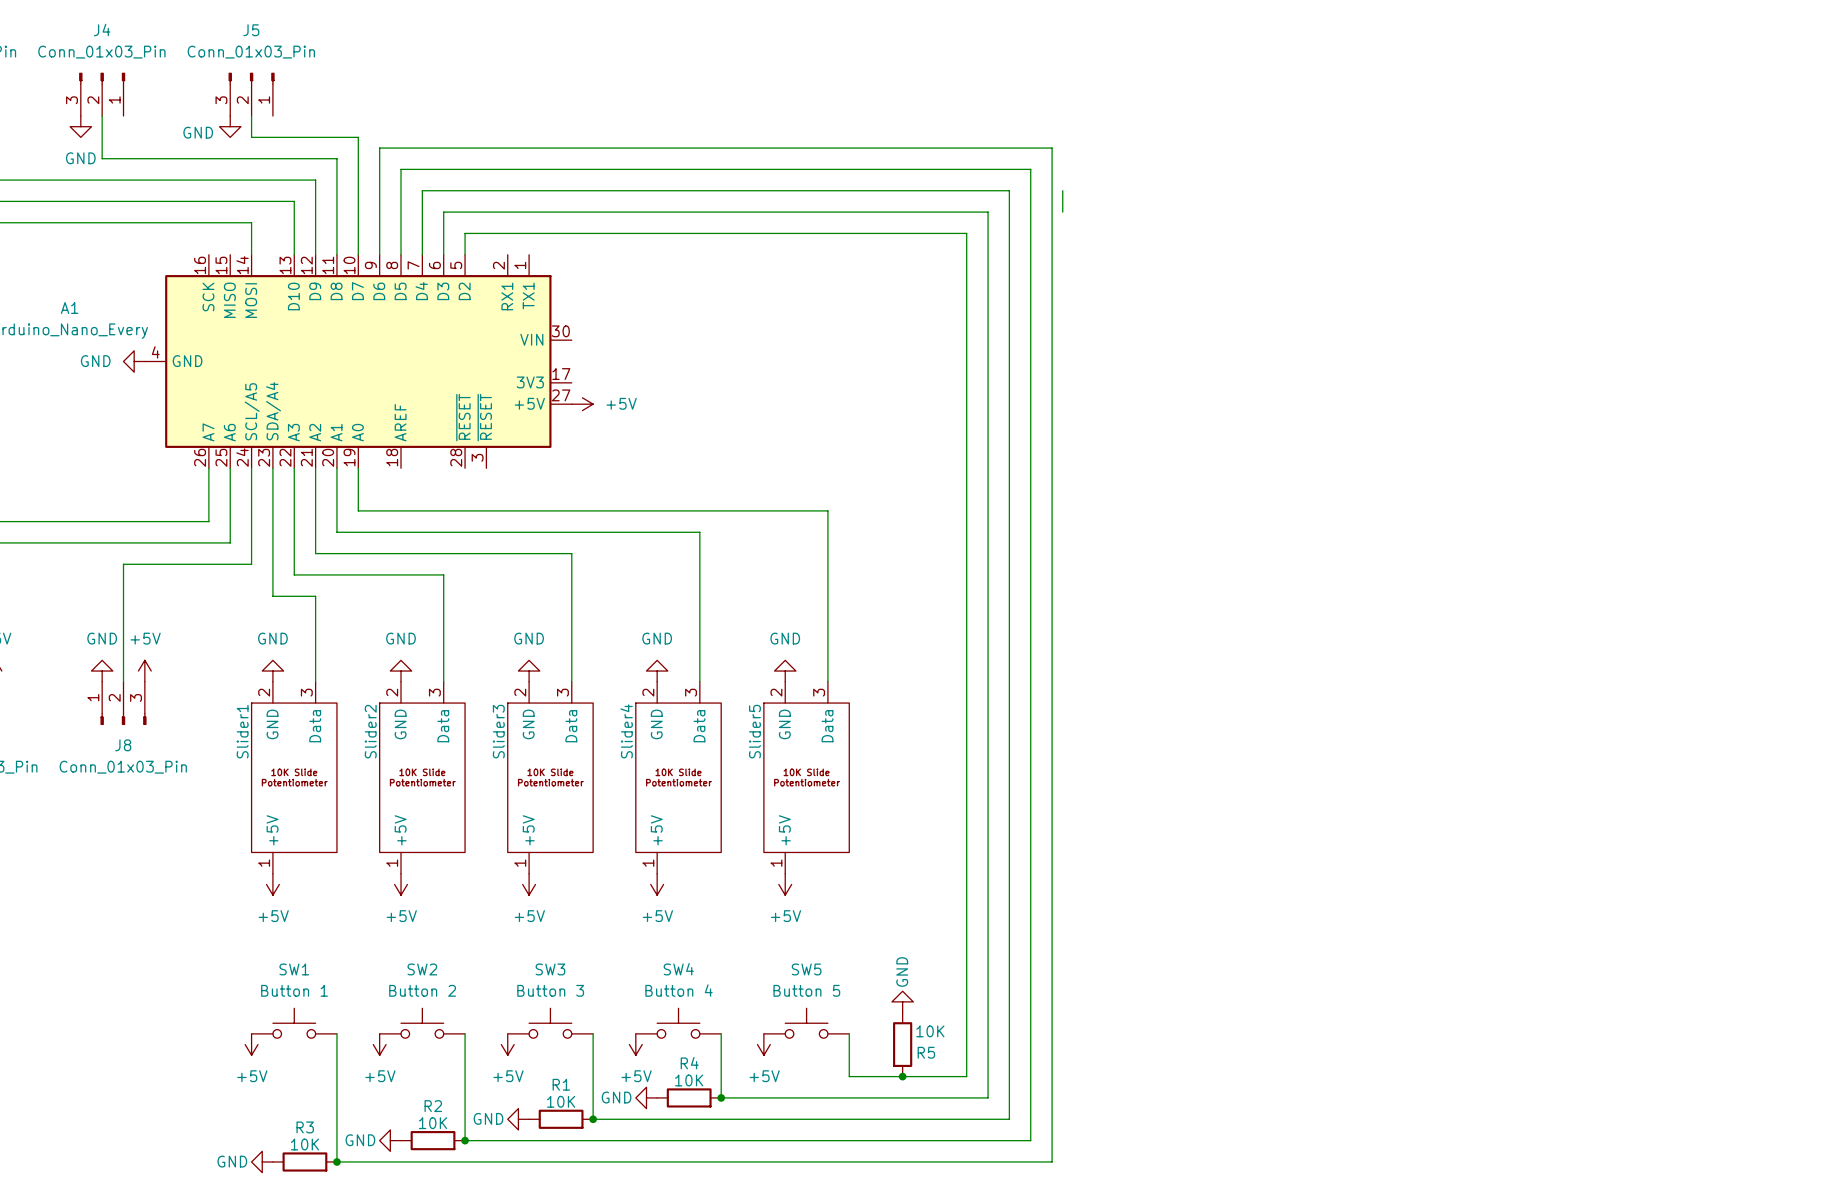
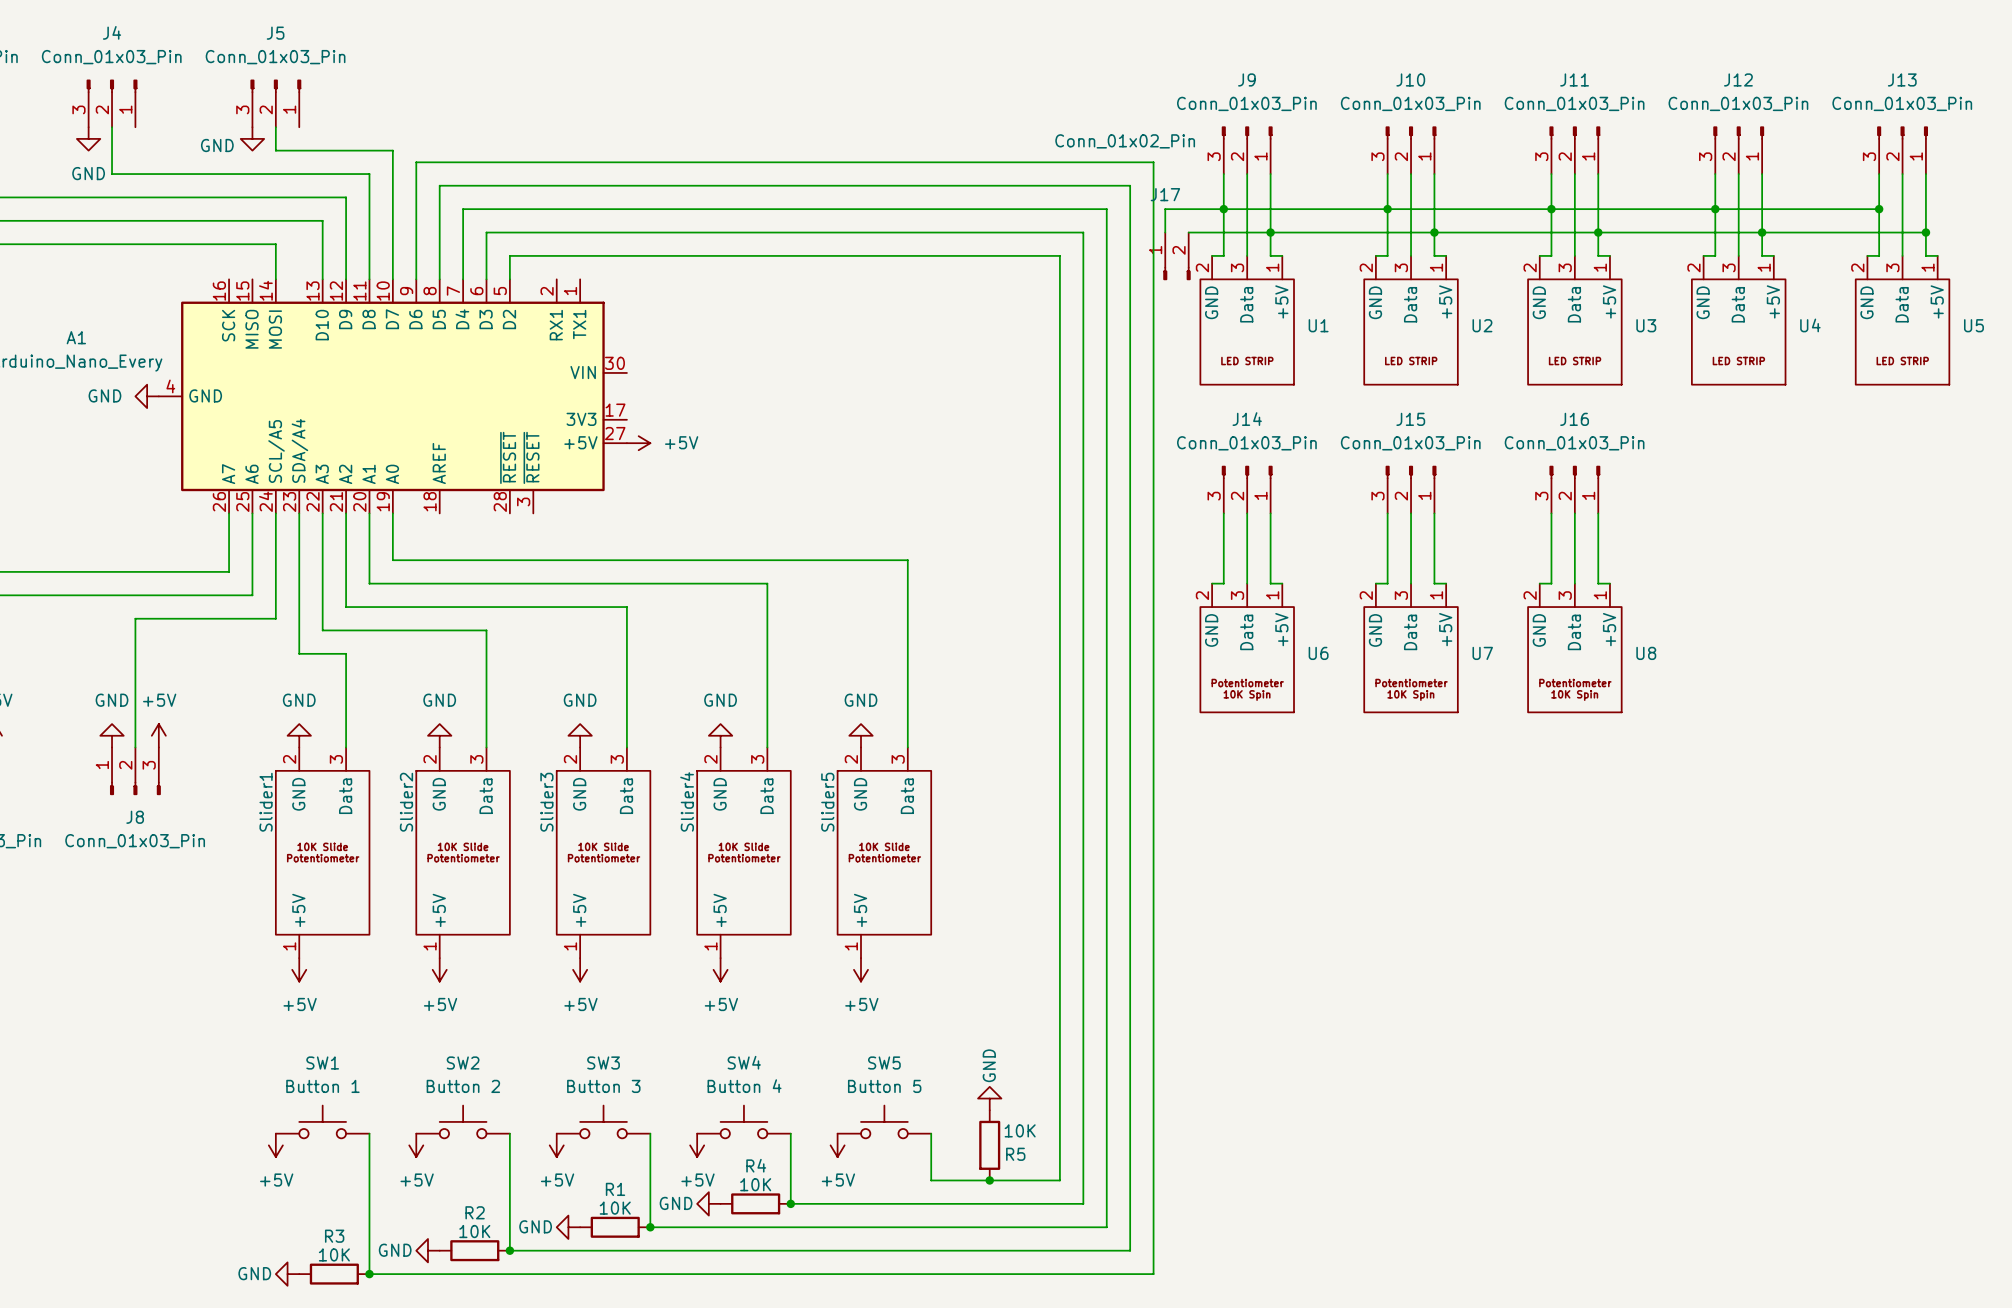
J9: none -> Conn_01x03_Pin (1247, 150)
J10: none -> Conn_01x03_Pin (1411, 150)
J11: none -> Conn_01x03_Pin (1574, 150)
J12: none -> Conn_01x03_Pin (1738, 150)
J13: none -> Conn_01x03_Pin (1902, 150)
wire: none -> (1223, 174) (1223, 255) (1212, 255)
wire: none -> (1247, 174) (1247, 255)
wire: none -> (1270, 174) (1270, 255) (1282, 255)
wire: none -> (1387, 174) (1387, 255) (1375, 255)
wire: none -> (1411, 174) (1411, 255)
wire: none -> (1434, 174) (1434, 255) (1446, 255)
wire: none -> (1551, 174) (1551, 255) (1539, 255)
wire: none -> (1574, 174) (1574, 255)
wire: none -> (1598, 174) (1598, 255) (1609, 255)
wire: none -> (1715, 174) (1715, 255) (1703, 255)
wire: none -> (1738, 174) (1738, 255)
wire: none -> (1762, 174) (1762, 255) (1773, 255)
wire: none -> (1879, 174) (1879, 255) (1867, 255)
wire: none -> (1902, 174) (1902, 255)
wire: none -> (1925, 174) (1925, 255) (1937, 255)
wire: none -> (1165, 209) (1879, 209)
junction: none -> (1223, 209)
junction: none -> (1387, 209)
junction: none -> (1551, 209)
junction: none -> (1715, 209)
junction: none -> (1879, 209)
wire: none -> (1188, 232) (1925, 232)
junction: none -> (1270, 232)
junction: none -> (1434, 232)
junction: none -> (1598, 232)
junction: none -> (1762, 232)
junction: none -> (1925, 232)
J17: none -> Conn_01x02_Pin (1176, 256)
U1: none -> (1247, 320)
U2: none -> (1411, 320)
U3: none -> (1574, 320)
U4: none -> (1738, 320)
U5: none -> (1902, 320)
J14: none -> Conn_01x03_Pin (1247, 489)
J15: none -> Conn_01x03_Pin (1411, 489)
J16: none -> Conn_01x03_Pin (1574, 489)
wire: none -> (1223, 513) (1223, 583) (1212, 583)
wire: none -> (1247, 513) (1247, 583)
wire: none -> (1270, 513) (1270, 583) (1282, 583)
wire: none -> (1387, 513) (1387, 583) (1375, 583)
wire: none -> (1411, 513) (1411, 583)
wire: none -> (1434, 513) (1434, 583) (1446, 583)
wire: none -> (1551, 513) (1551, 583) (1539, 583)
wire: none -> (1574, 513) (1574, 583)
wire: none -> (1598, 513) (1598, 583) (1609, 583)
U6: none -> (1247, 647)
U7: none -> (1411, 647)
U8: none -> (1574, 647)

